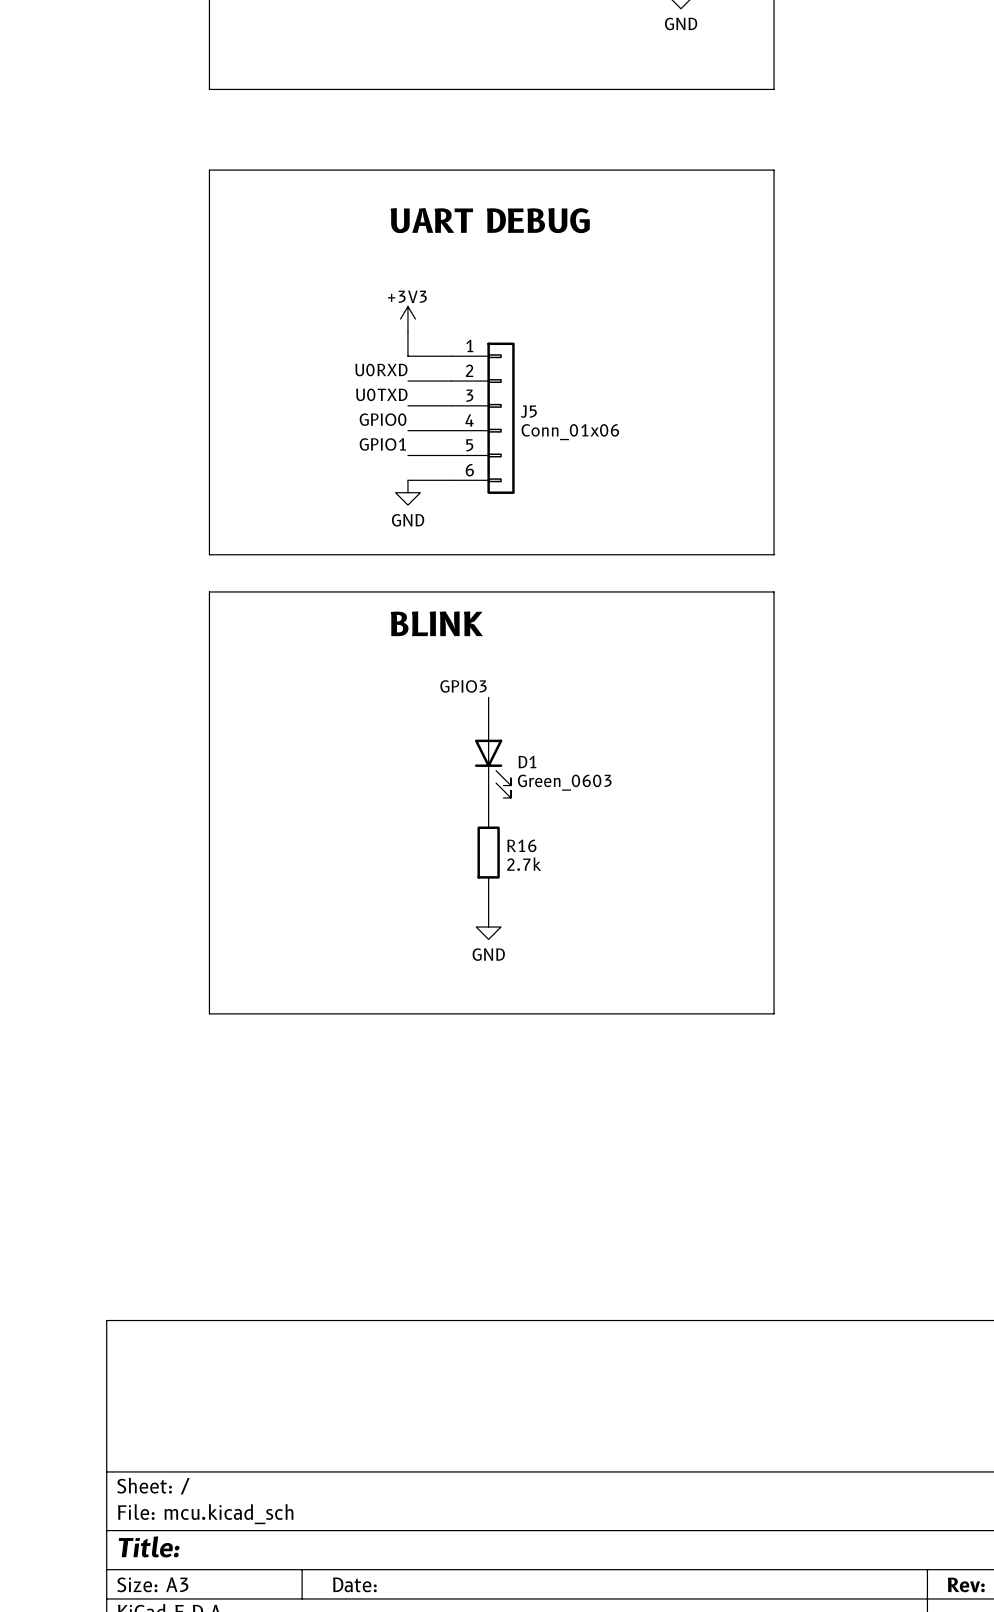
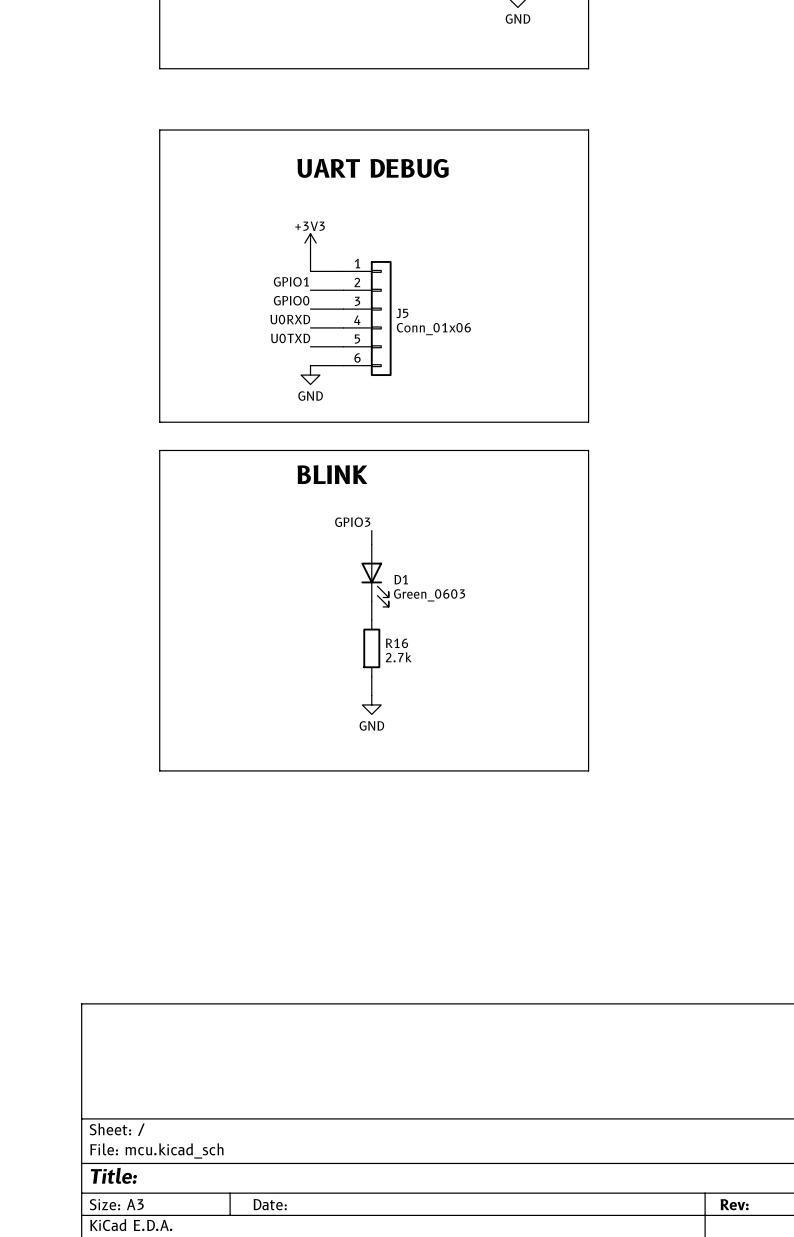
label: U0RXD (381, 370) -> GPIO1 (291, 281)
label: U0TXD (381, 394) -> GPIO0 (291, 300)
label: GPIO0 (383, 419) -> U0RXD (290, 319)
label: GPIO1 (382, 444) -> U0TXD (290, 338)

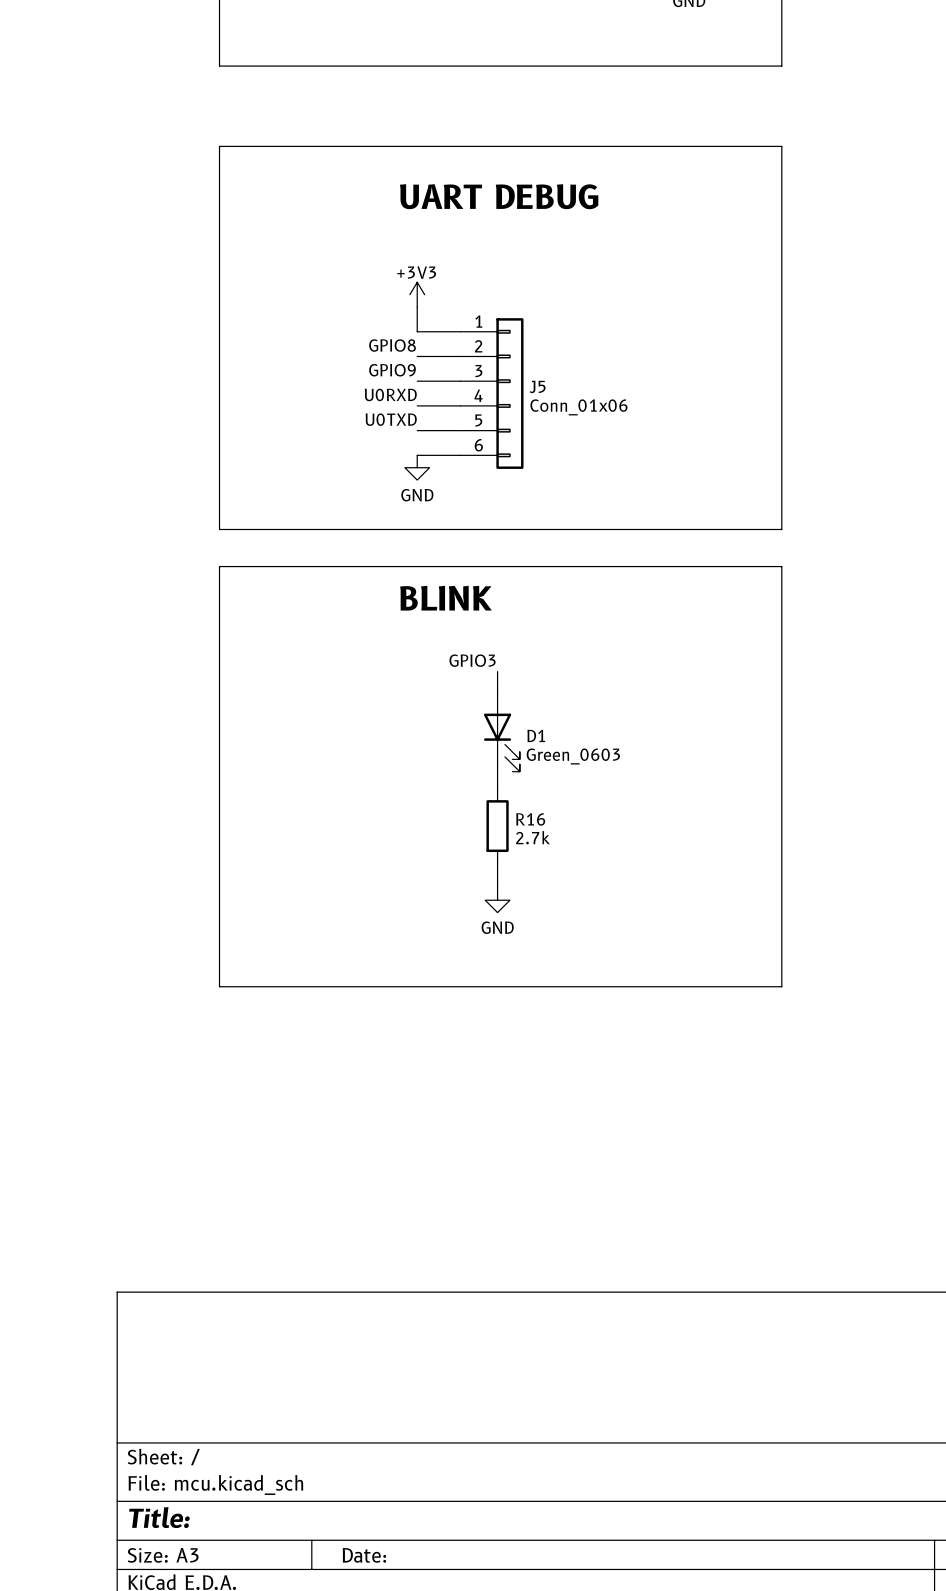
label: GPIO1 (291, 281) -> GPIO8 (392, 345)
label: GPIO0 (291, 300) -> GPIO9 (392, 370)

